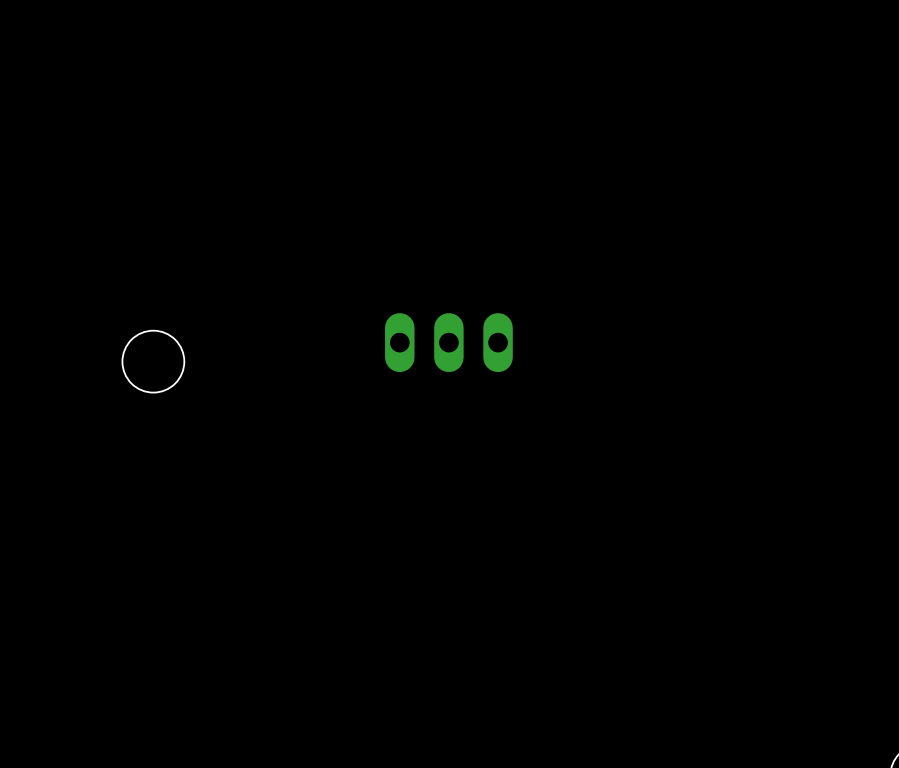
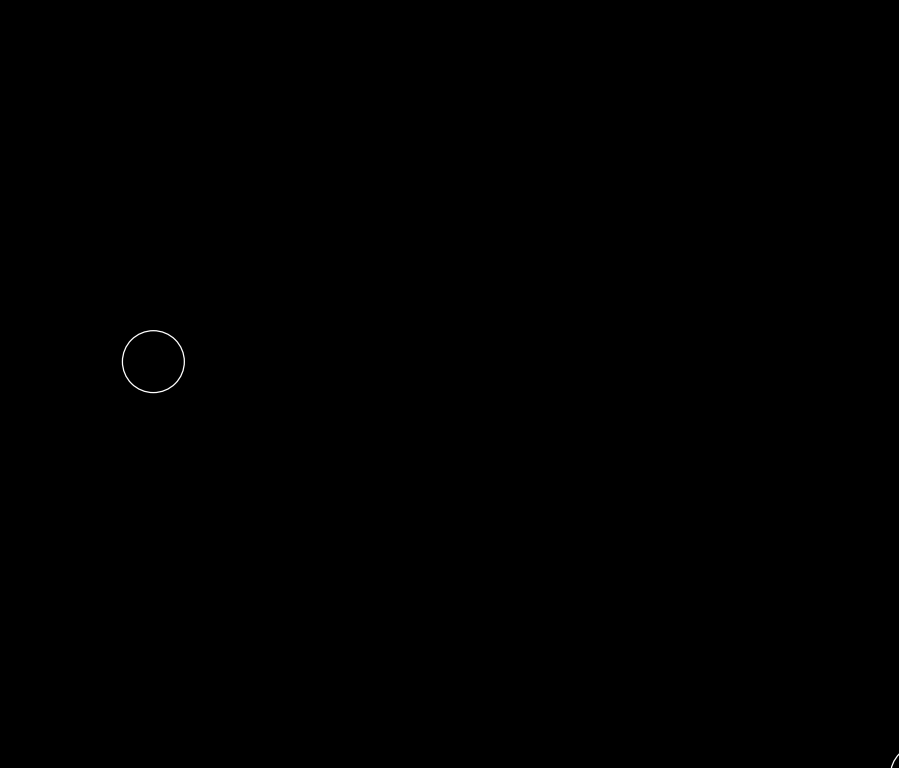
part: (448, 342) -> none

